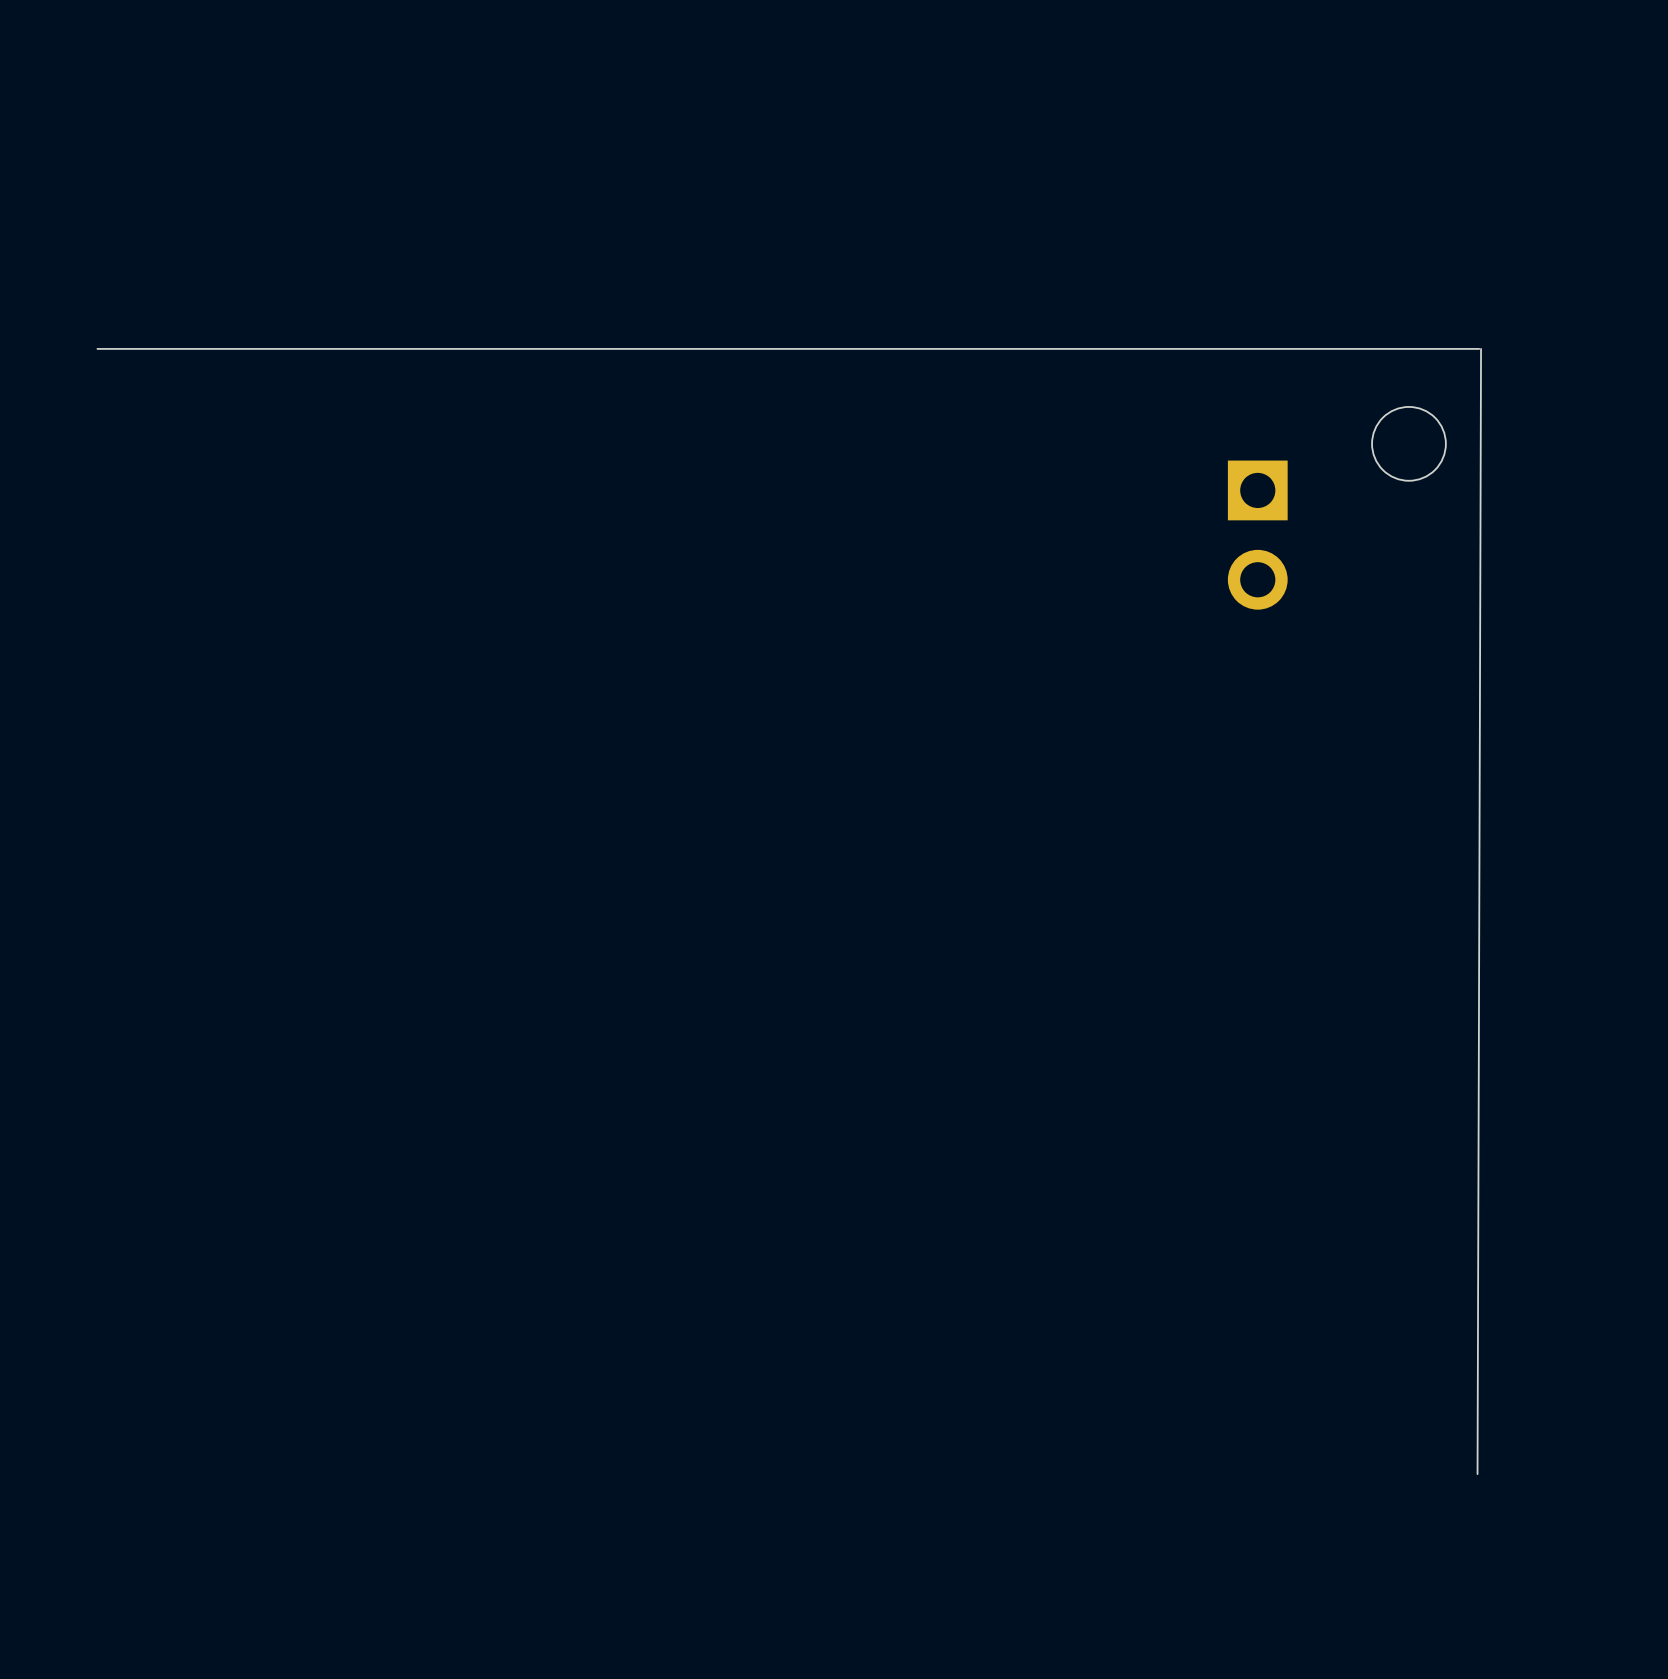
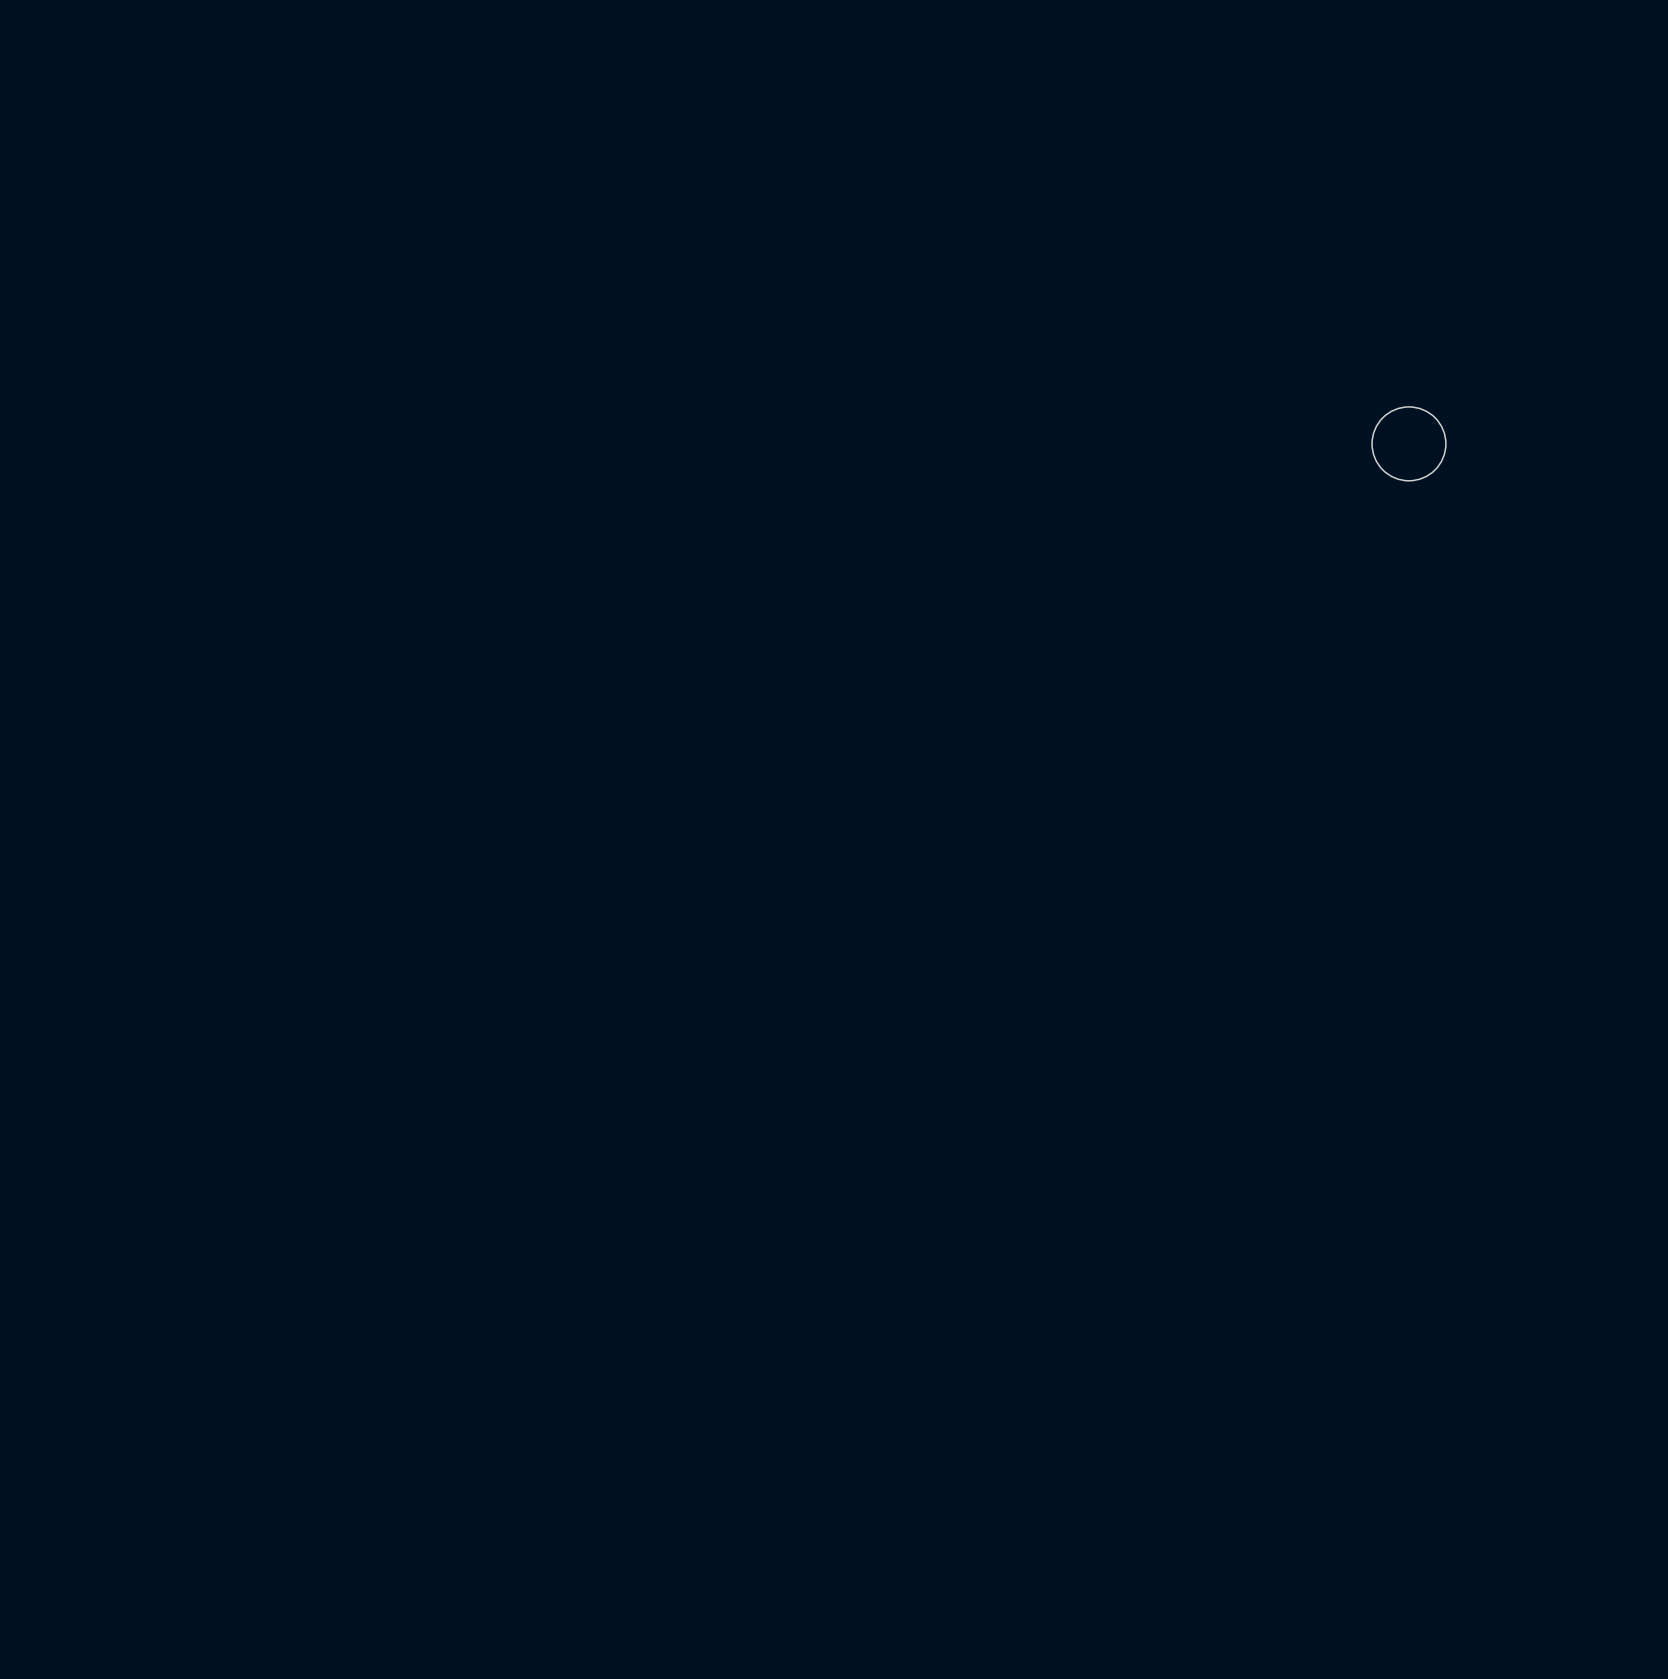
board edge: (1479, 348) (97, 348) -> none
board edge: (1481, 348) (1477, 1474) -> none
part: (1257, 535) -> none

